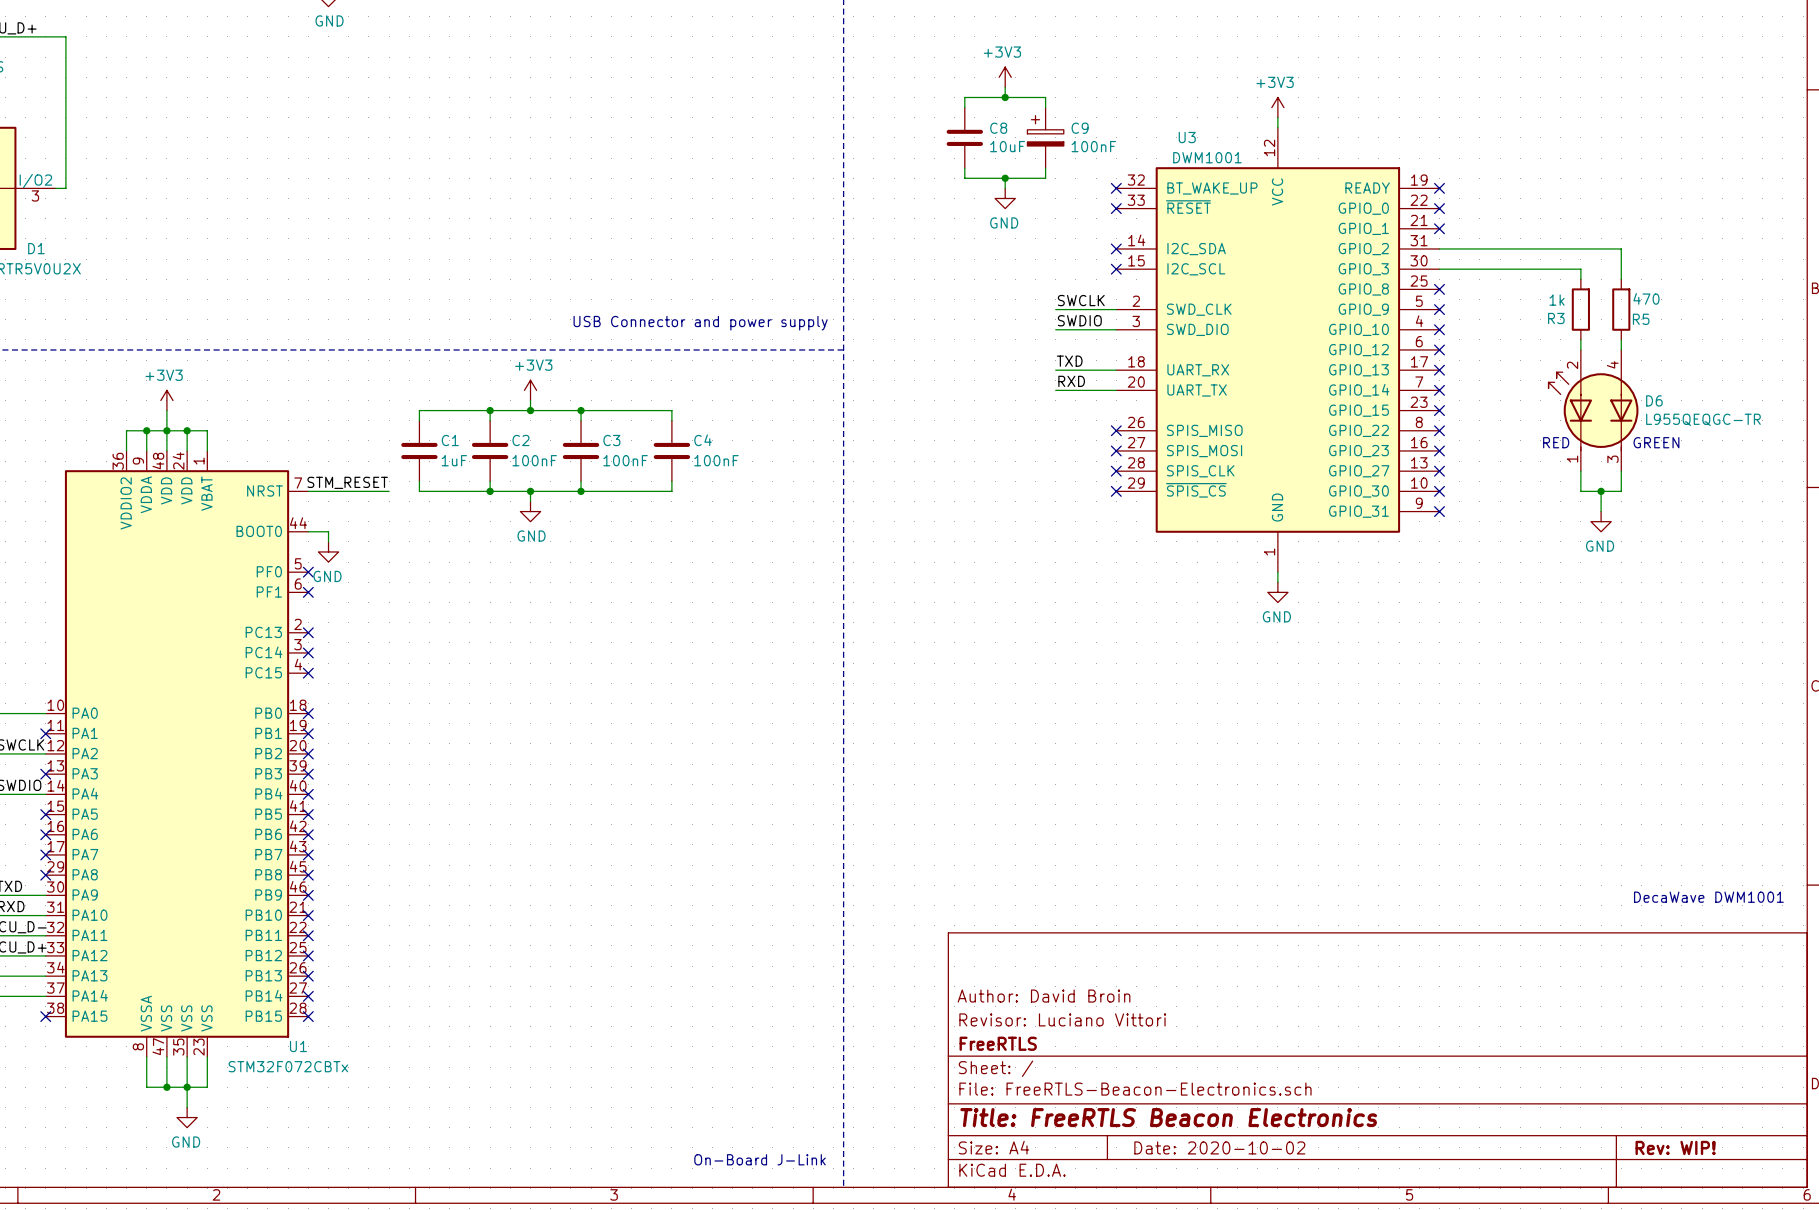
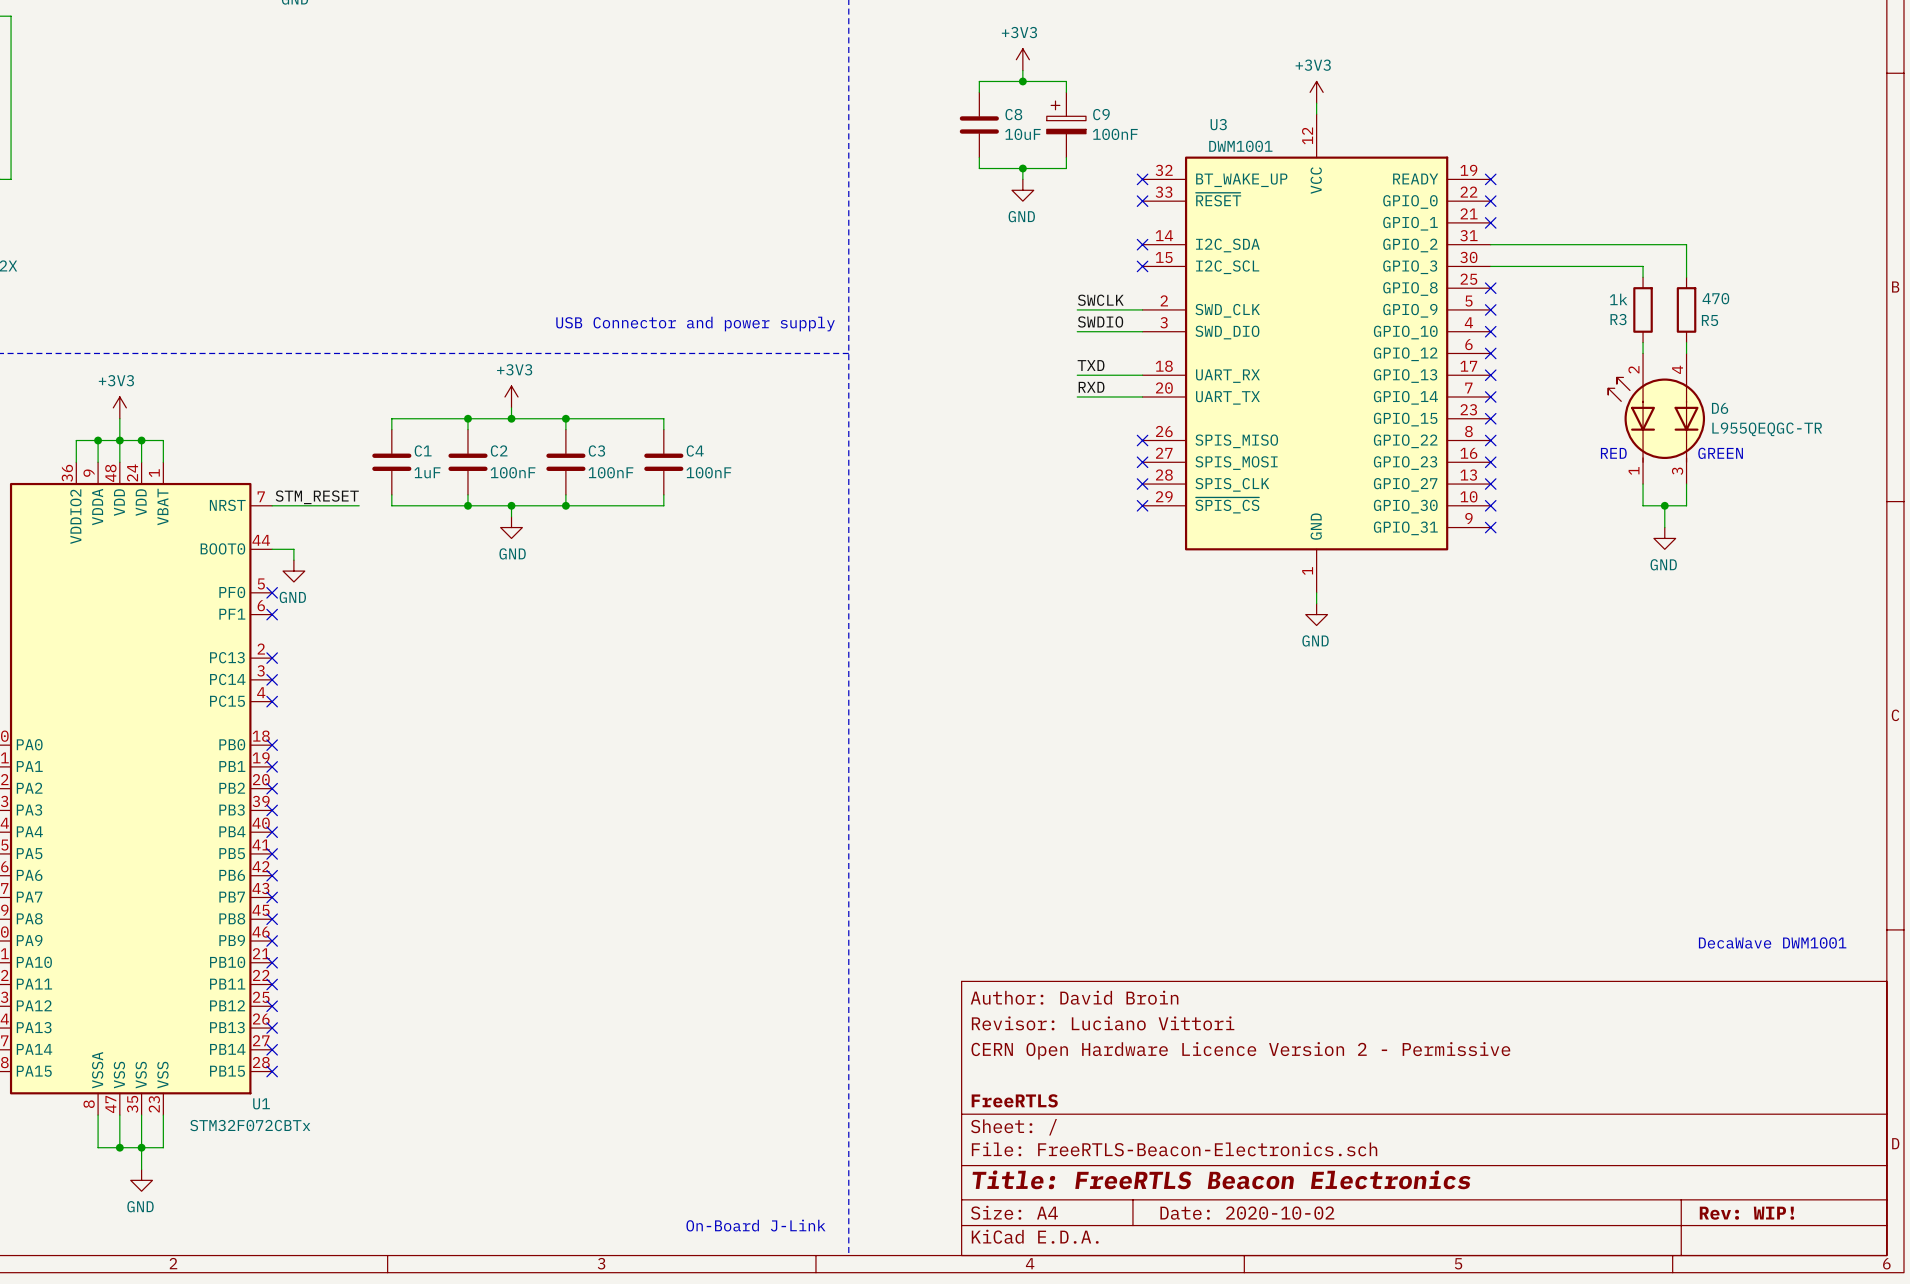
title block: none -> Author: David Broin (1074, 997)
title block: Author: David Broin (1044, 996) -> CERN Open Hardware Licence Version 2 - Permissive (1240, 1050)
title block position: Revisor: Luciano Vittori (1062, 1019) -> Revisor: Luciano Vittori (1103, 1023)

